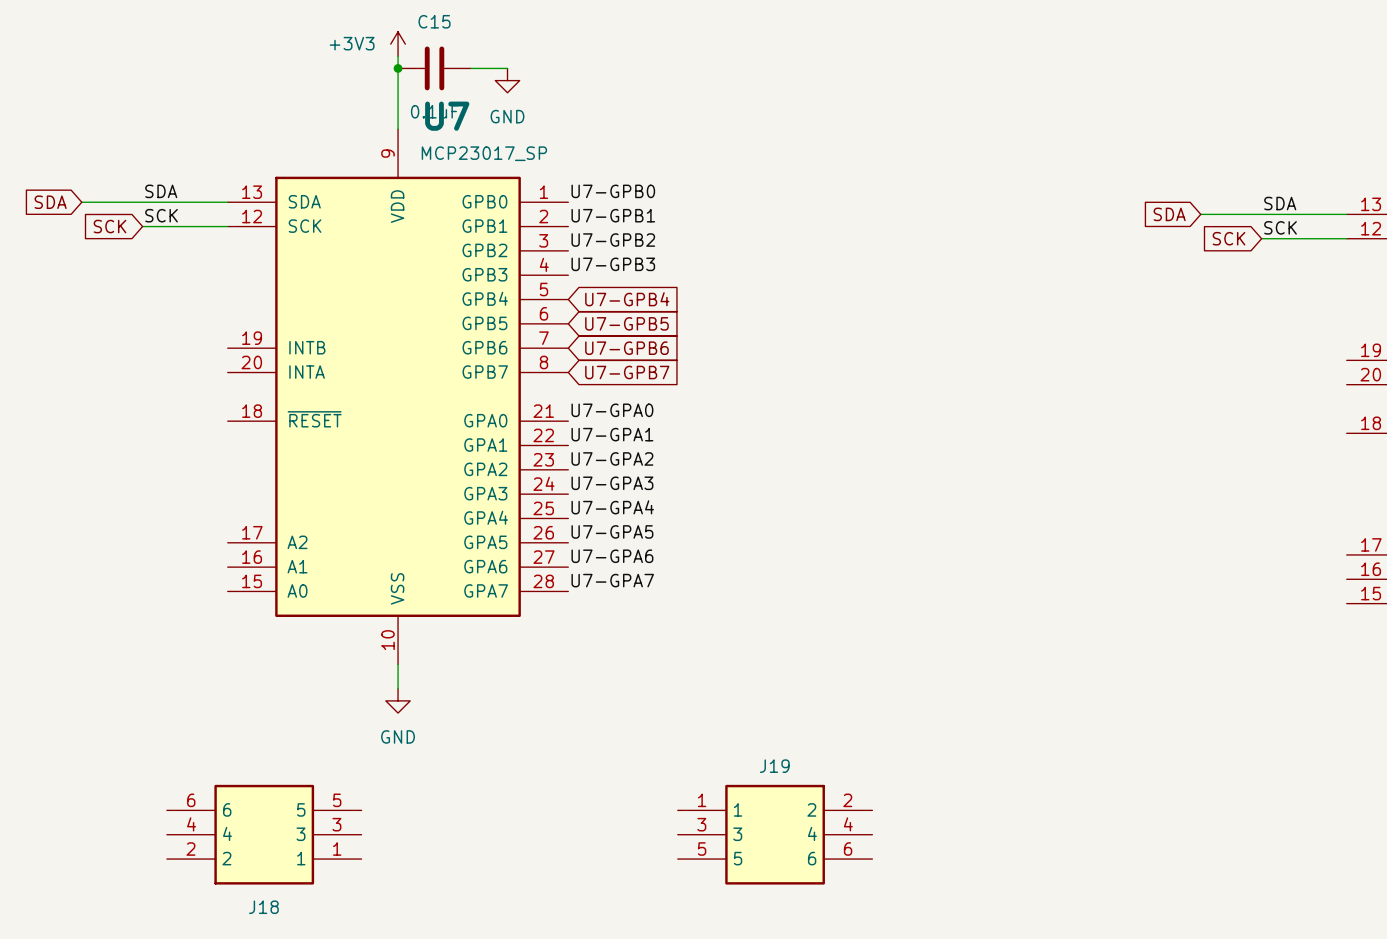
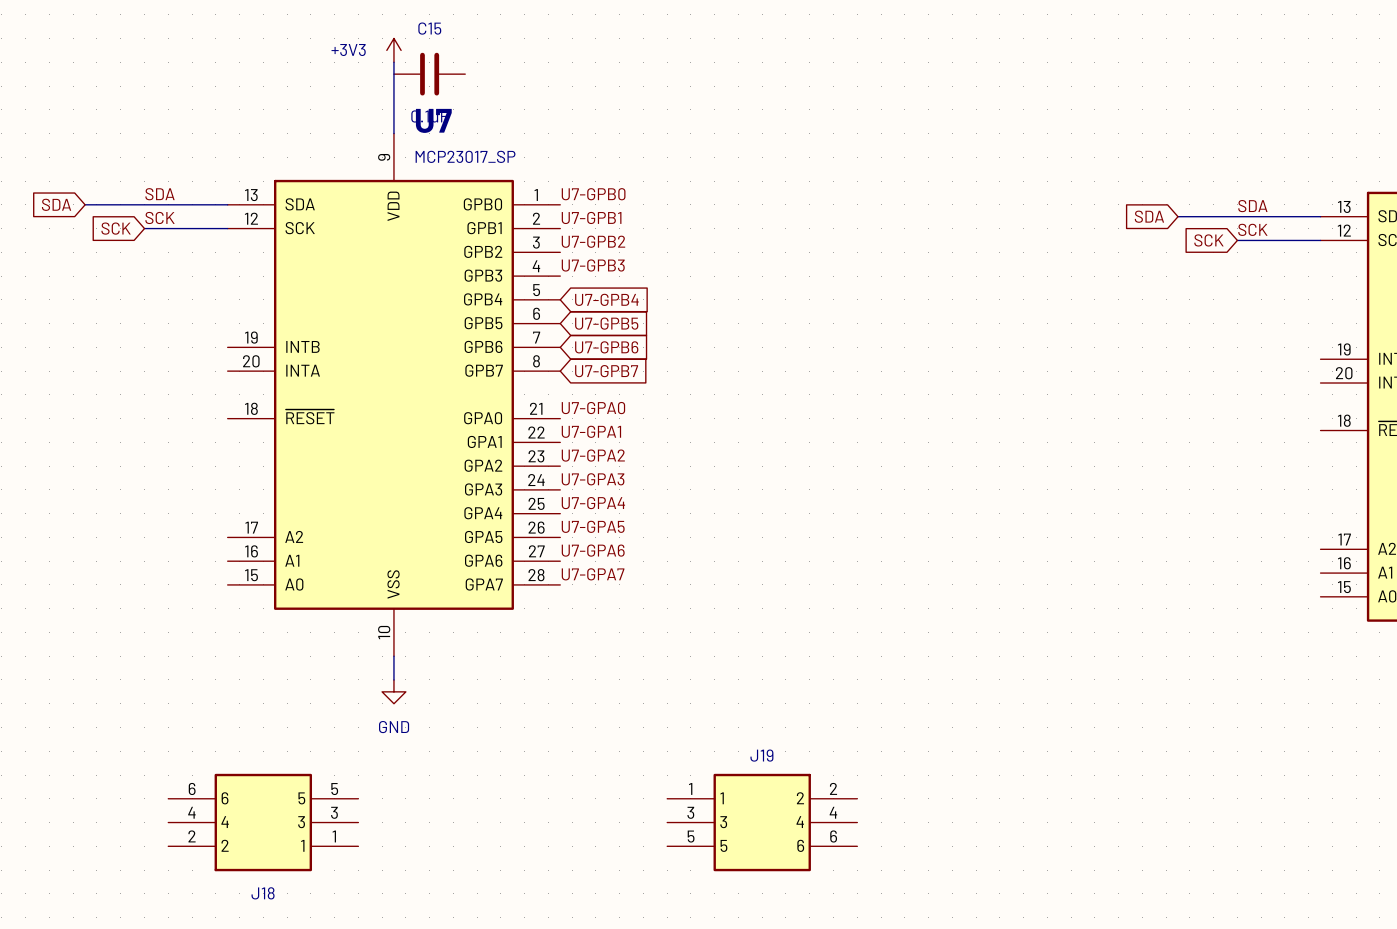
junction: (398, 68) -> none
wire: (471, 68) (507, 68) -> none
power symbol: GND (507, 80) -> none

